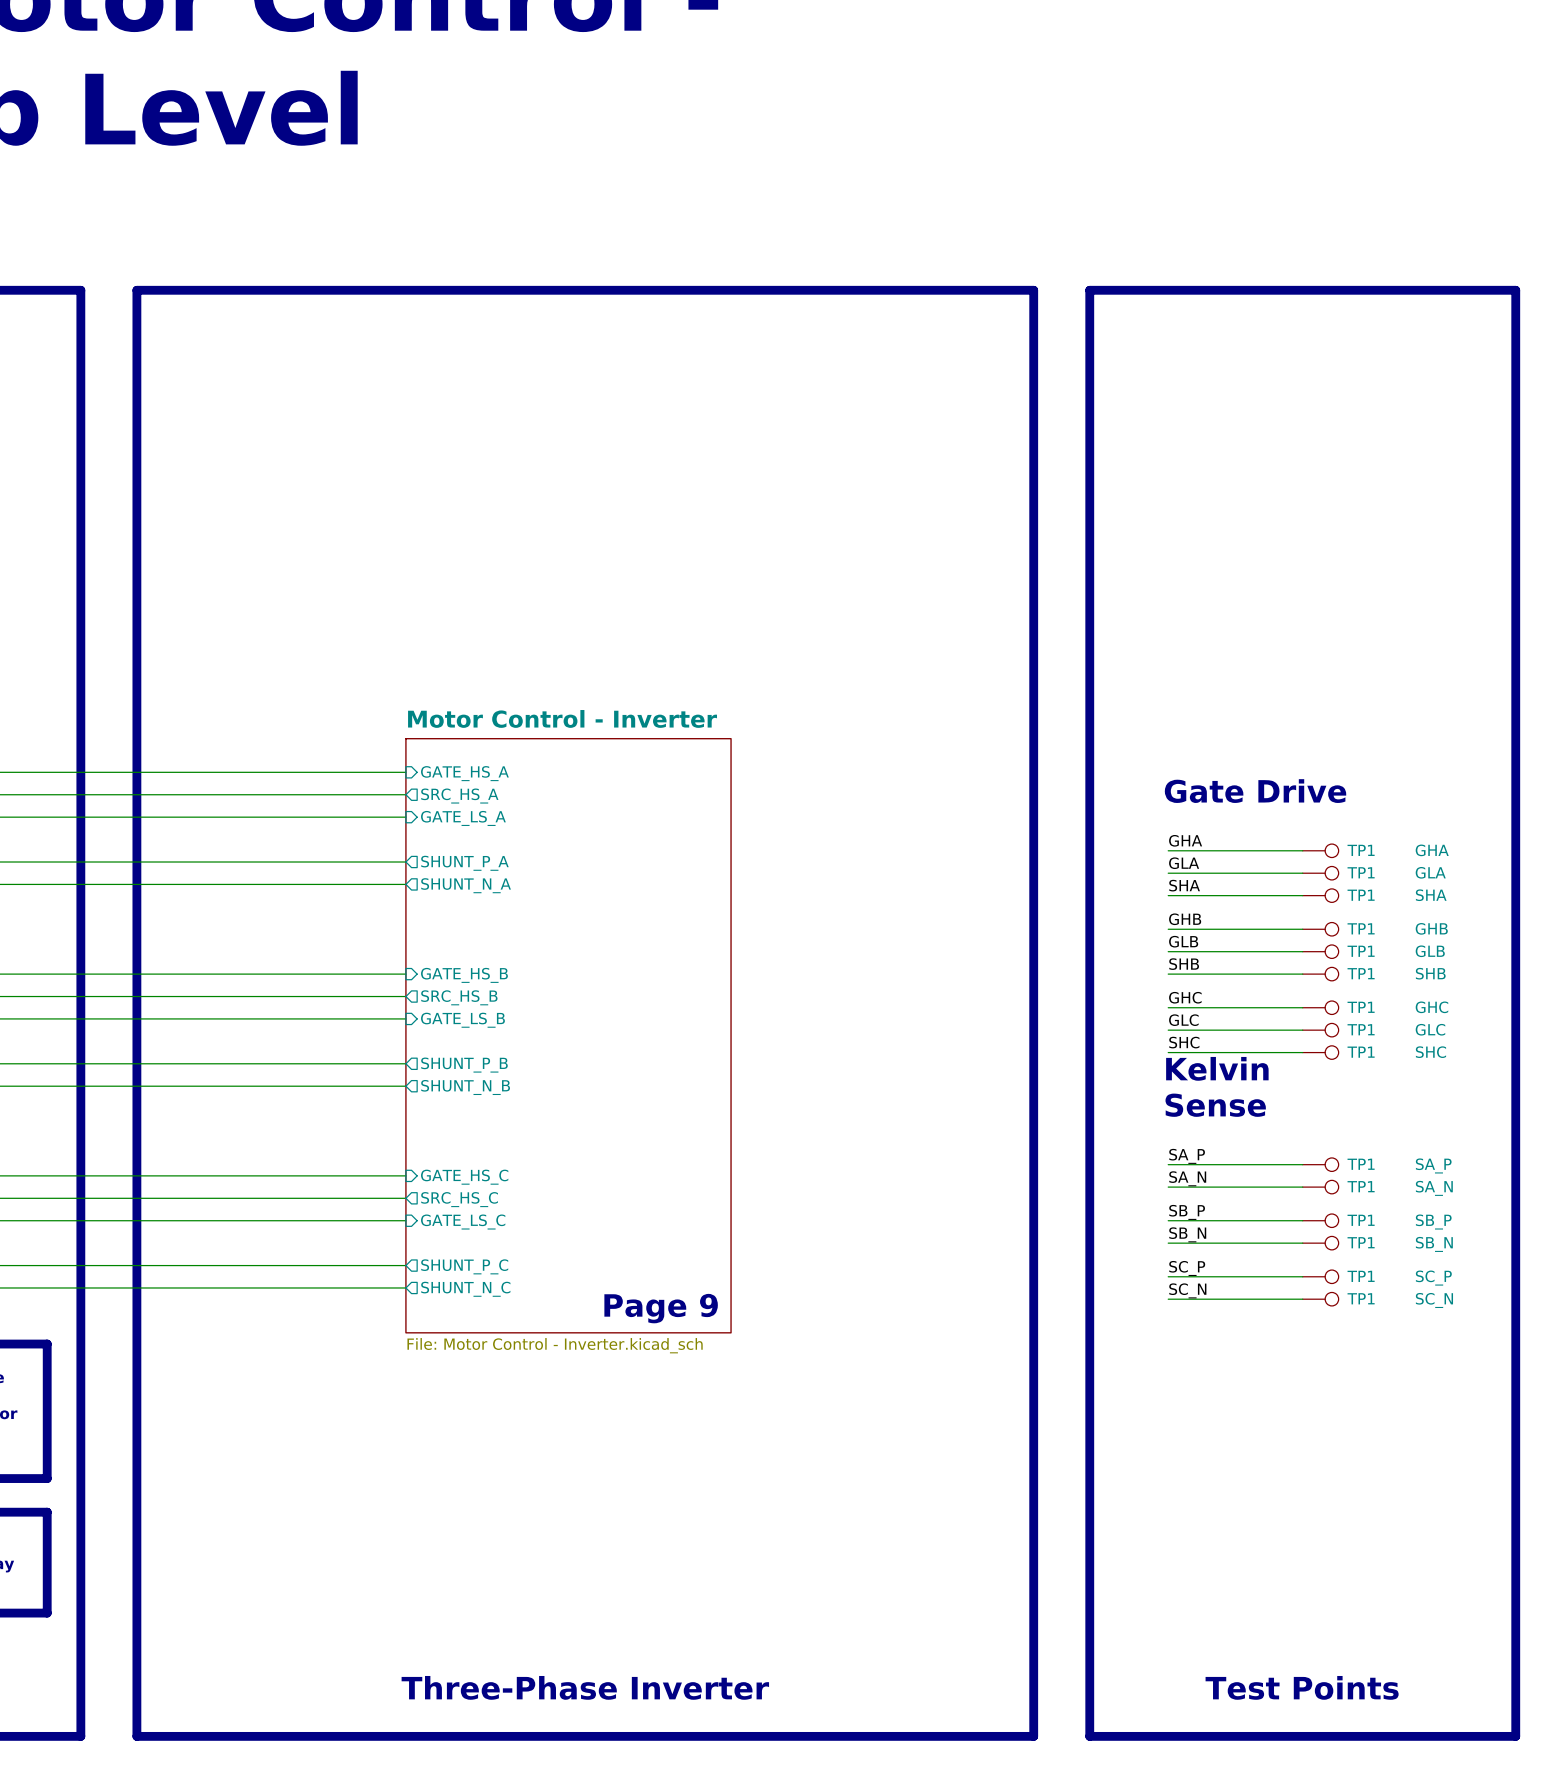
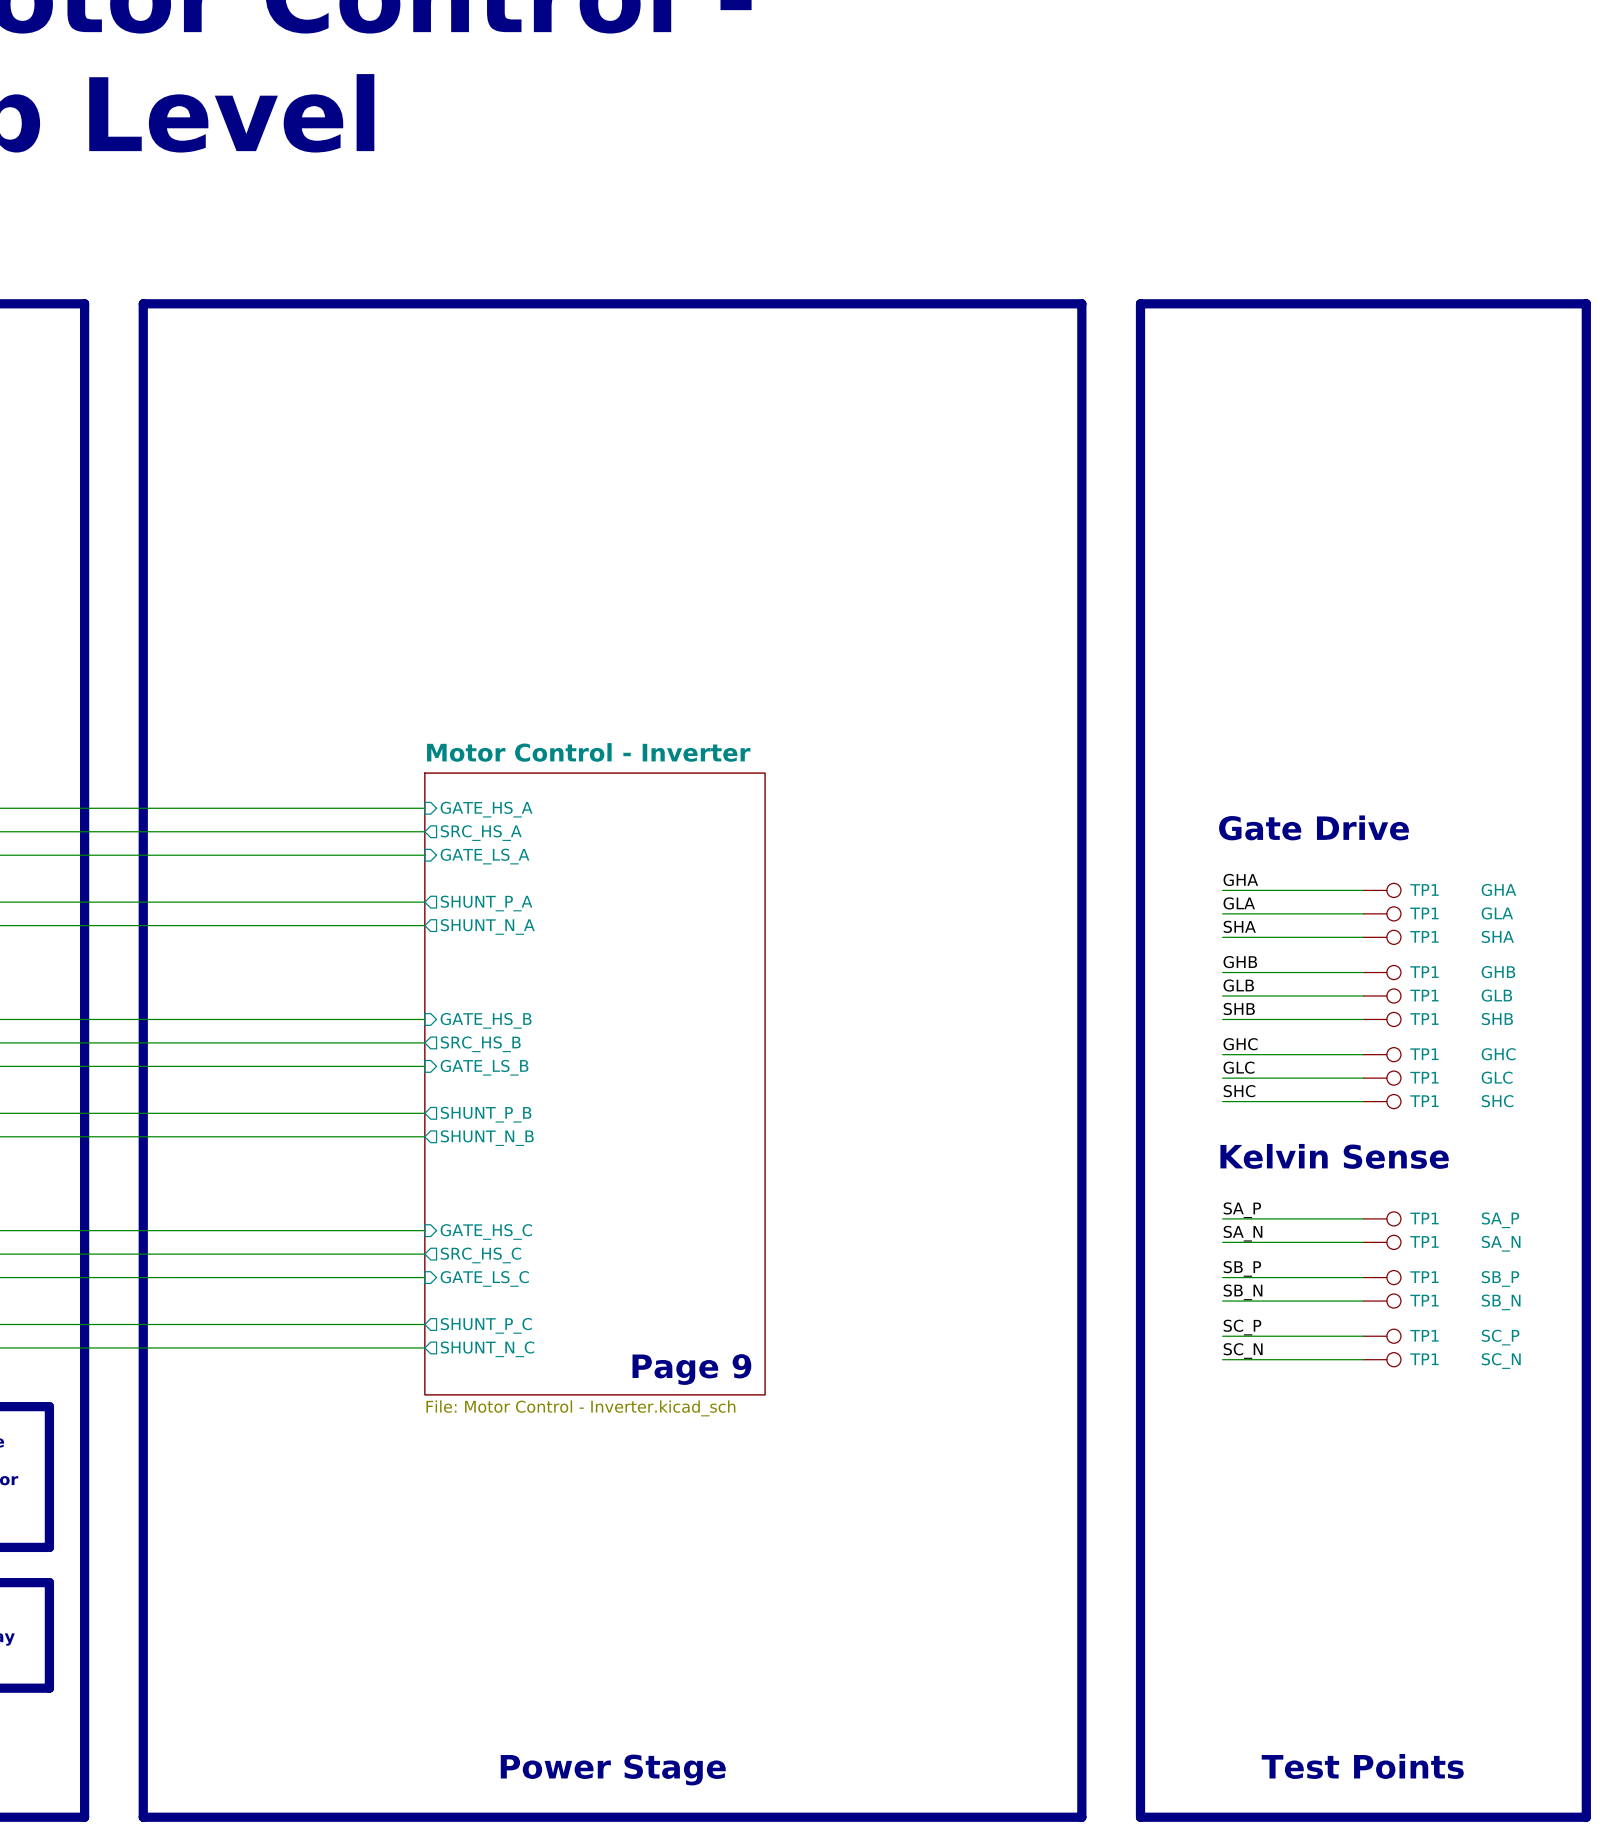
text: Kelvin (1217, 1068) -> none
text: Sense (1215, 1105) -> Kelvin Sense (1334, 1156)
text: Three-Phase Inverter (585, 1687) -> Power Stage (613, 1770)

